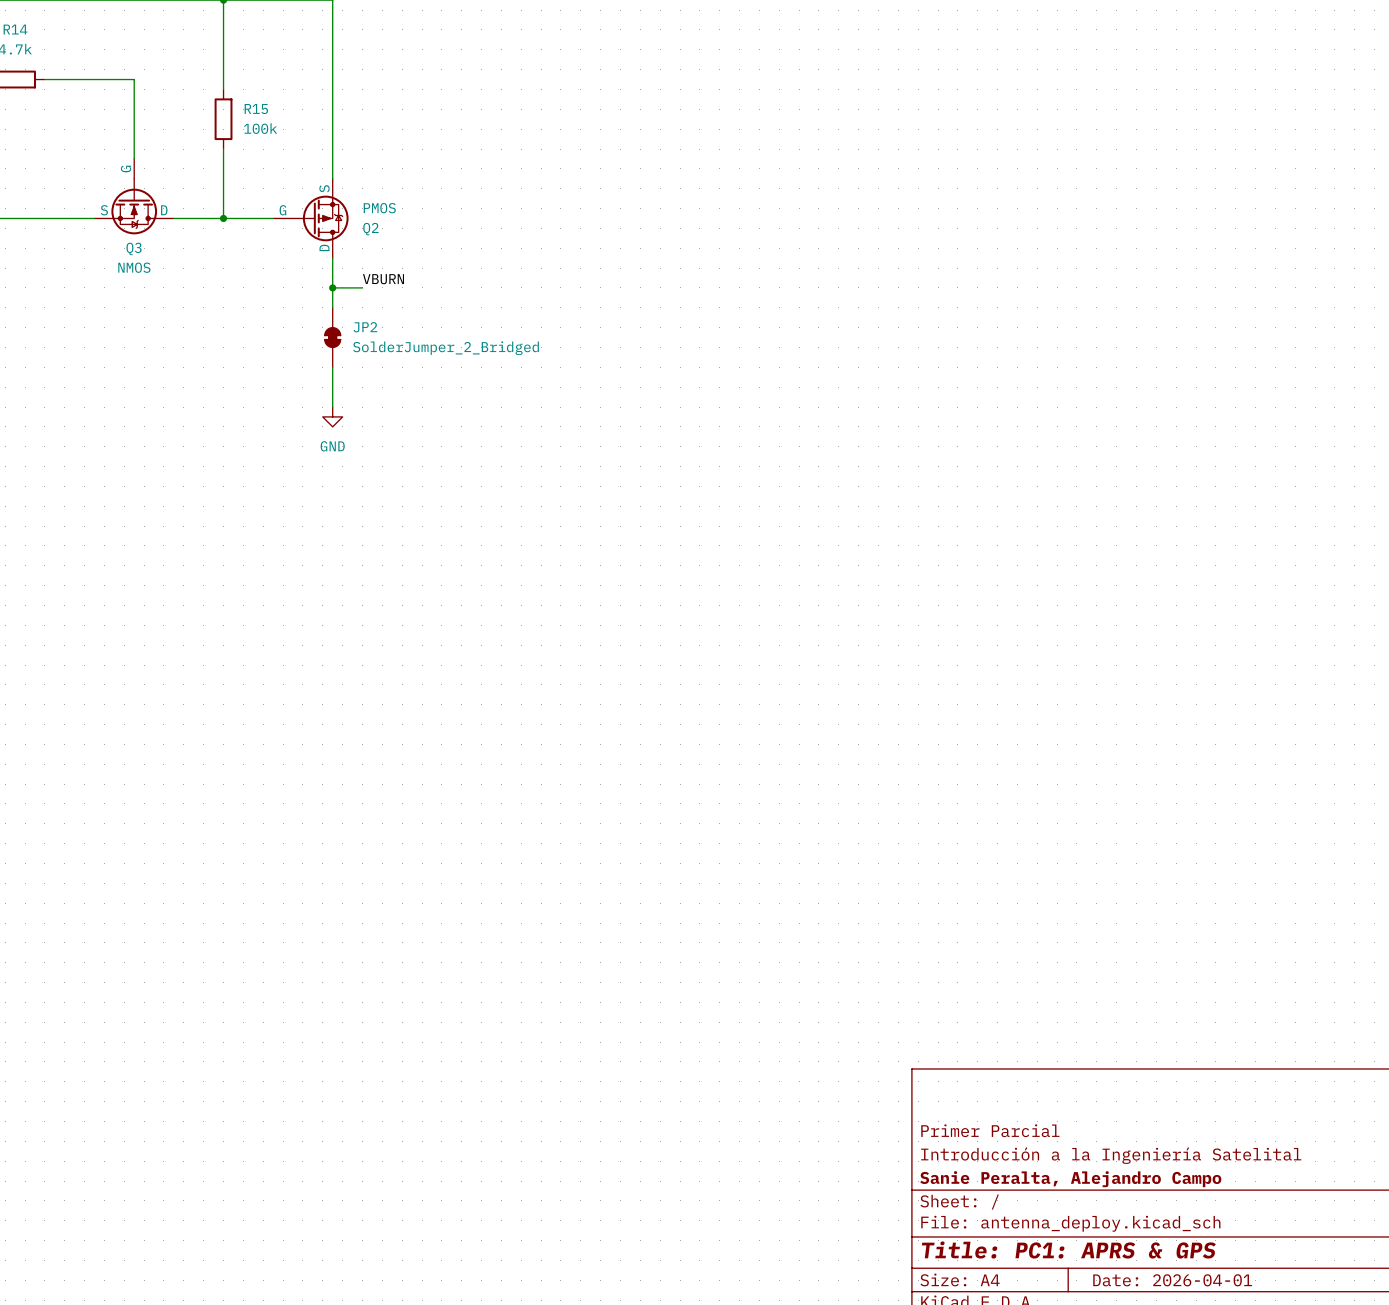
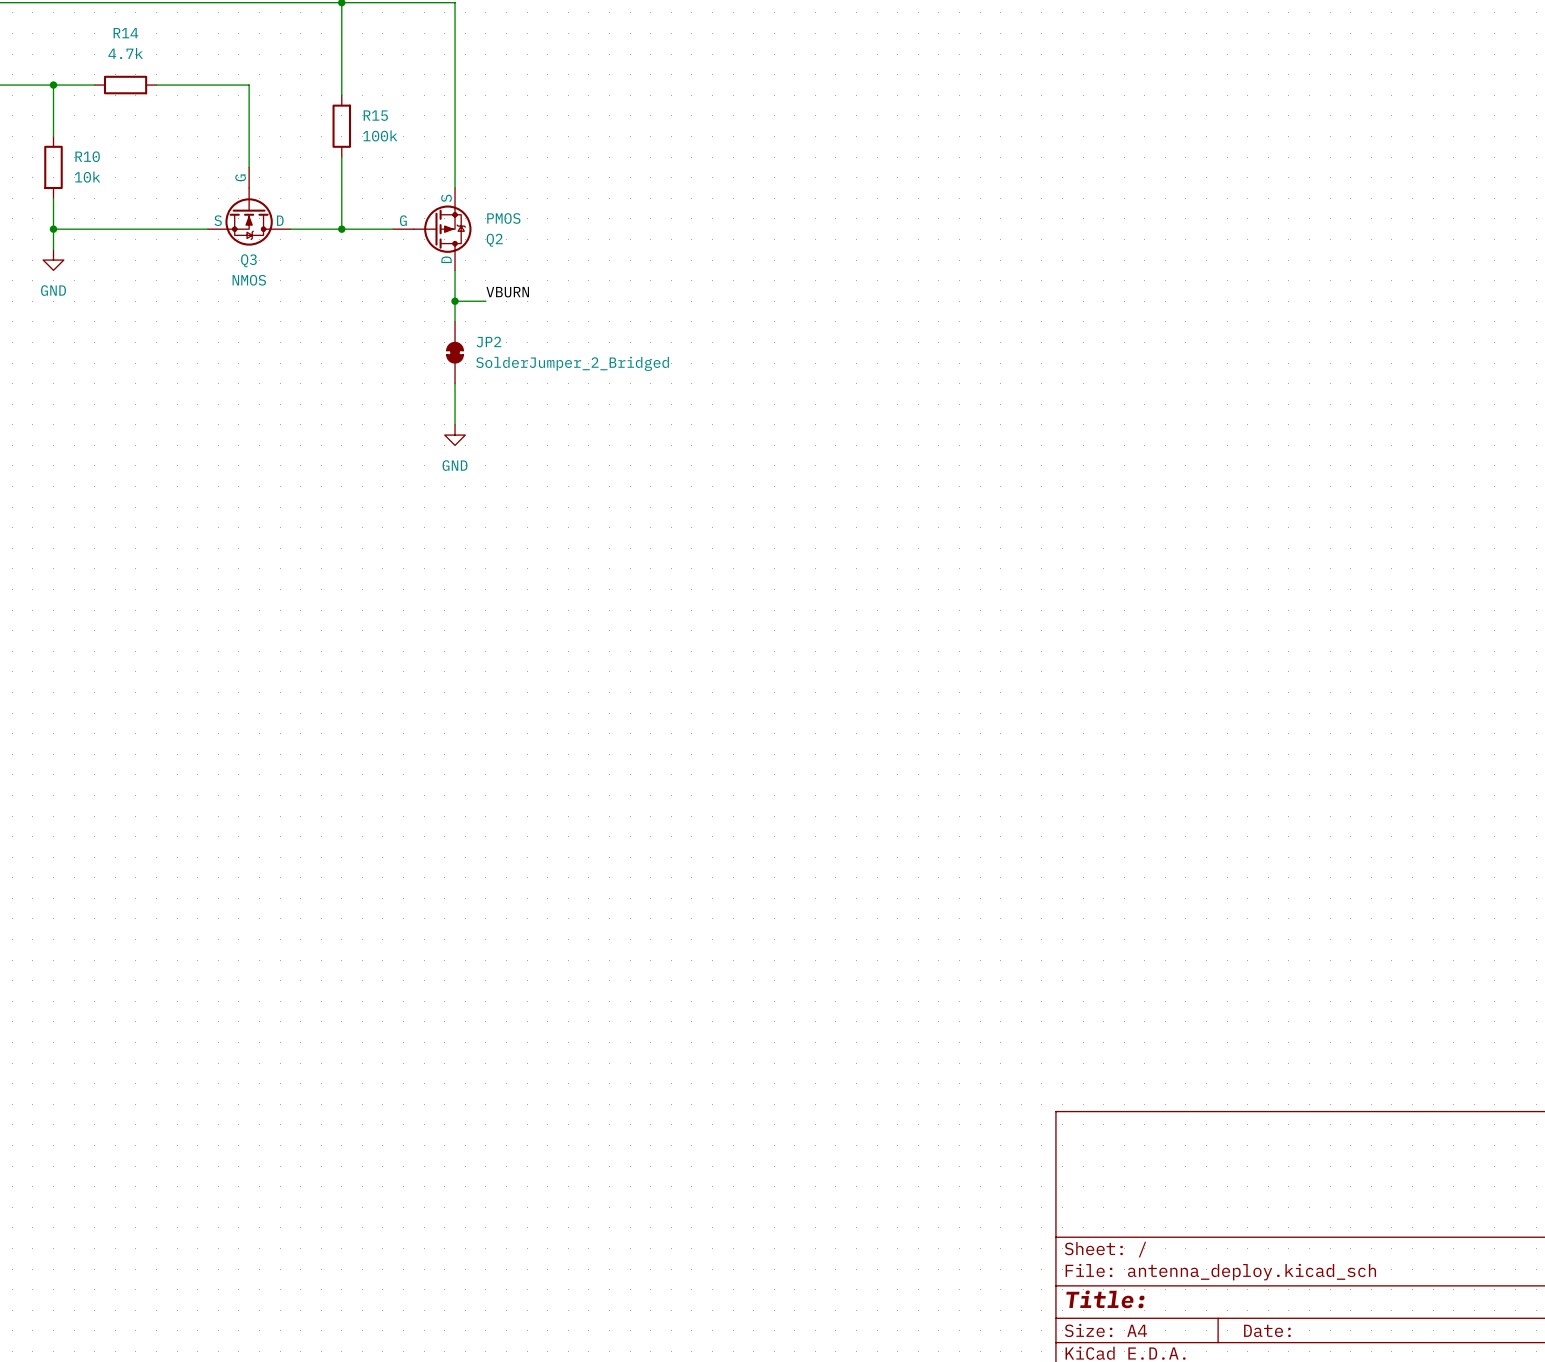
title block: Primer Parcial (990, 1130) -> none
title block: Introducción a la Ingeniería Satelital (1111, 1155) -> none
title block: Sanie Peralta, Alejandro Campo (1070, 1179) -> none
title block: Title: PC1: APRS & GPS (1068, 1250) -> Title: (1105, 1299)
title block: Date: 2026-04-01 (1172, 1280) -> Date: (1267, 1330)

